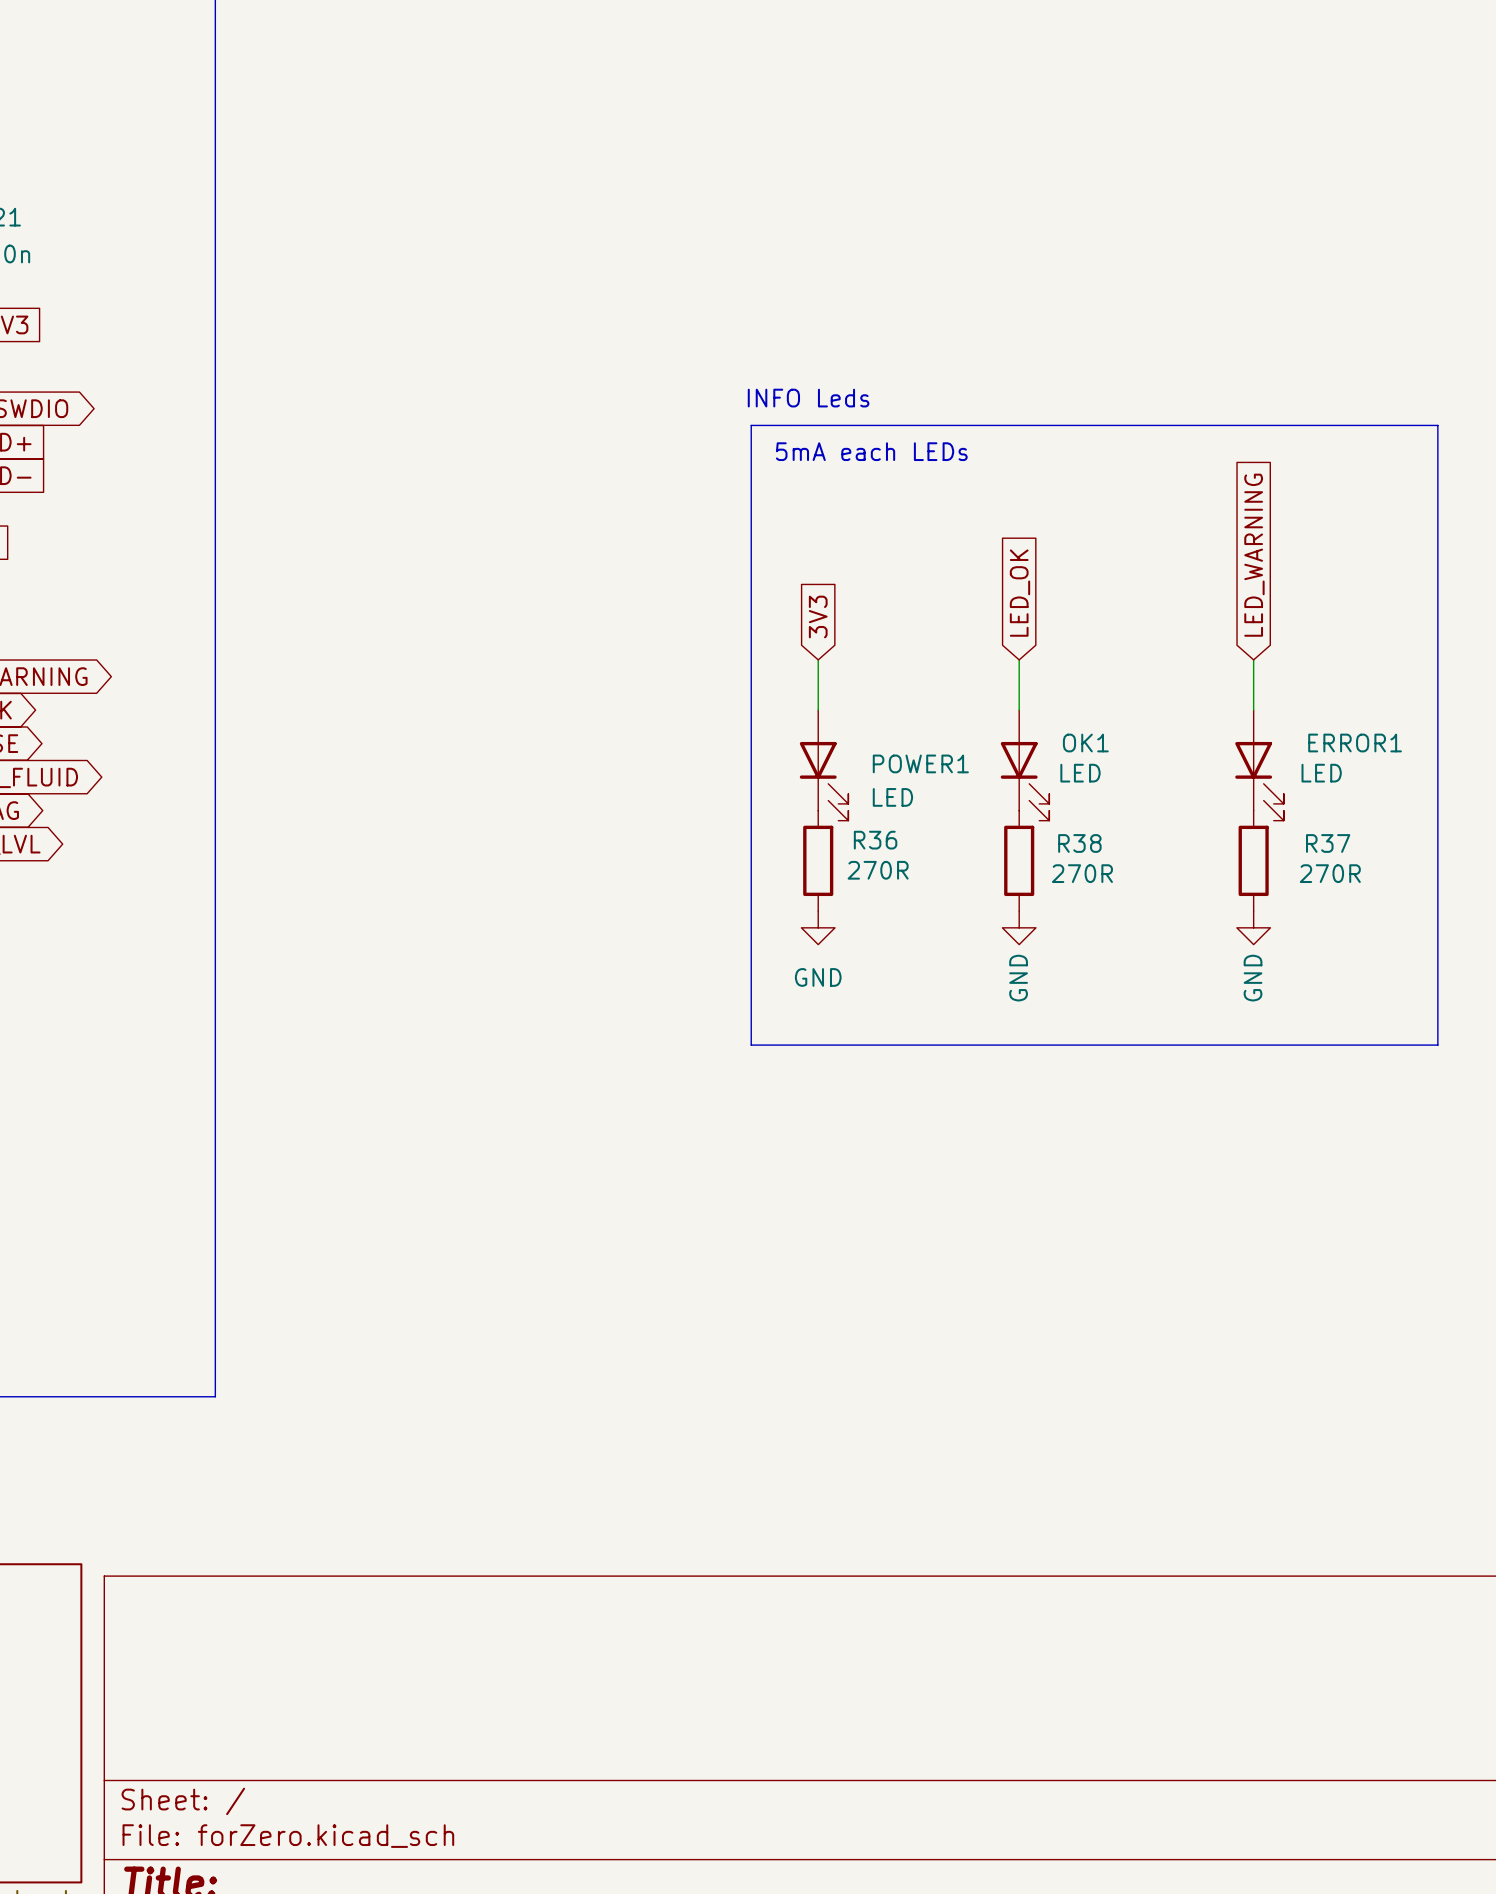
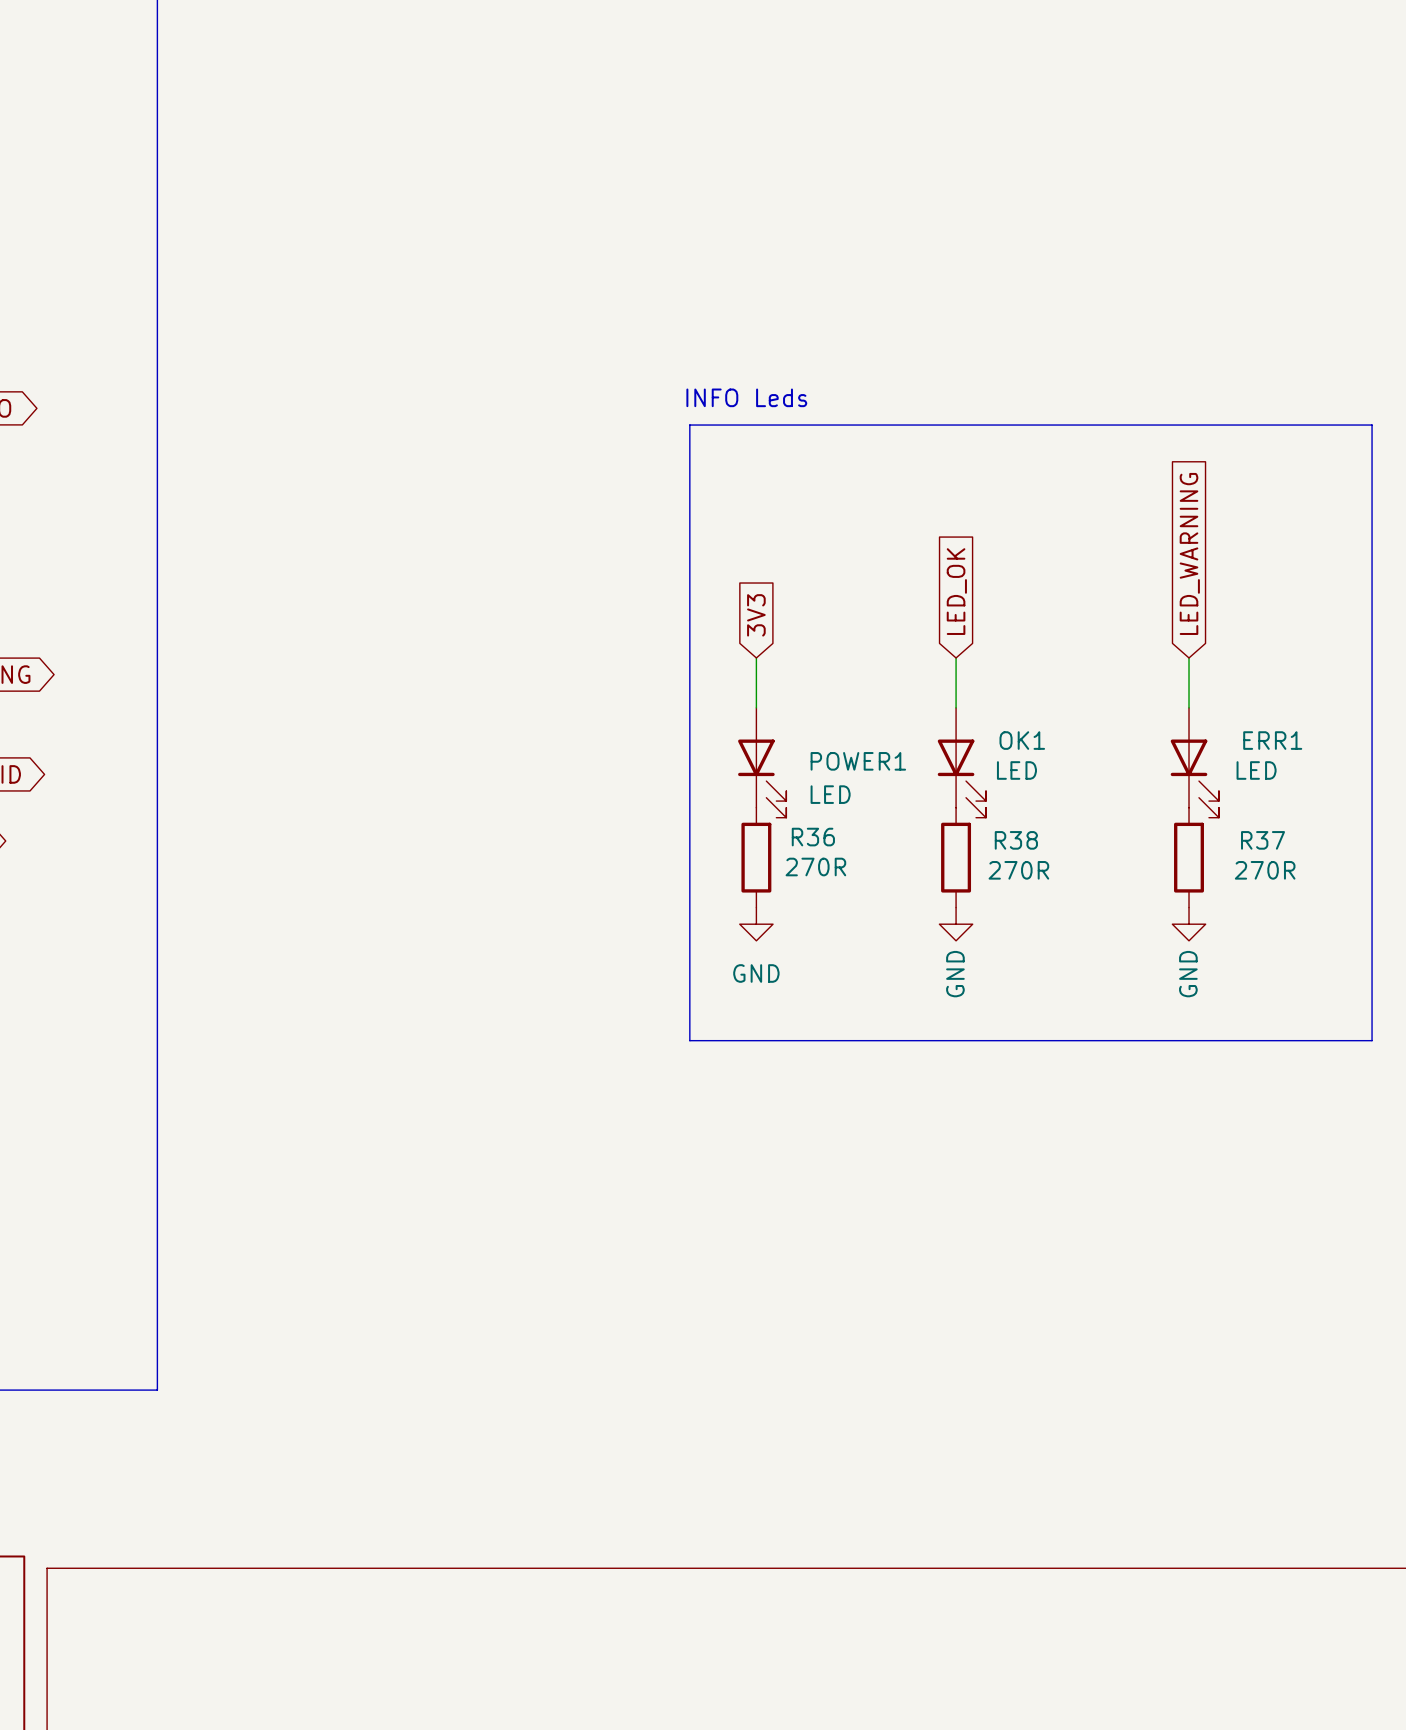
text: 5mA each LEDs (871, 451) -> none
ERROR1 name: ERROR1 (1355, 743) -> ERR1 (1272, 740)

